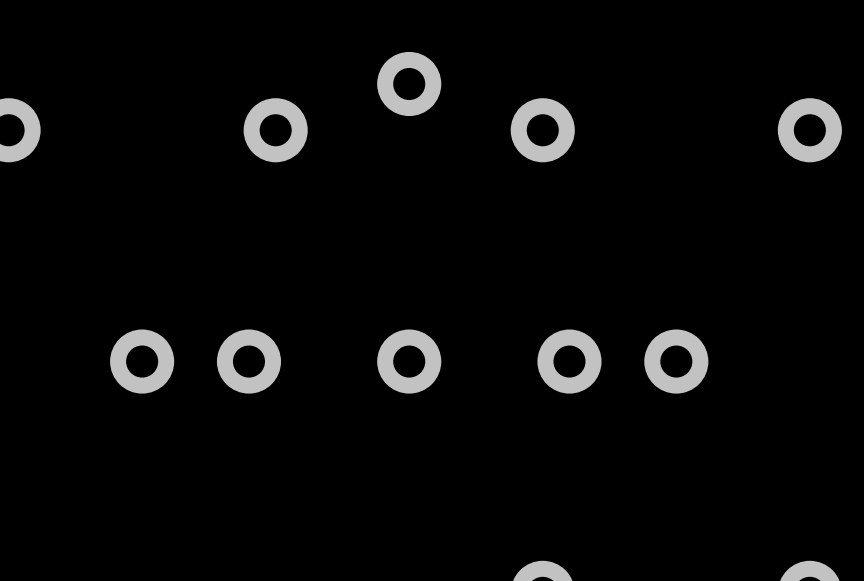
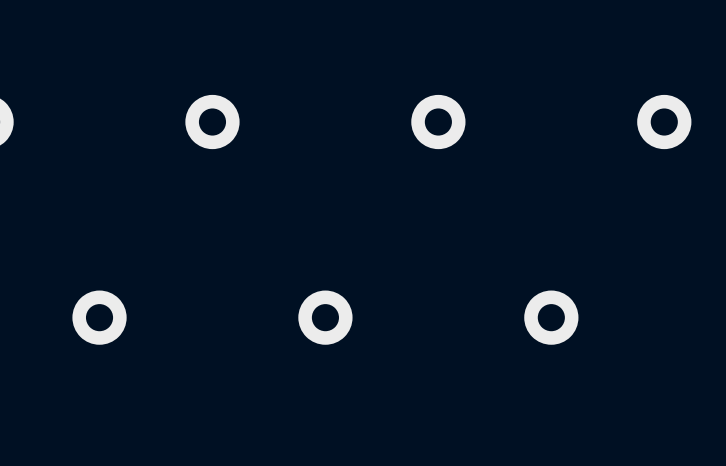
via: (409, 83) -> none
via: (248, 361) -> none
via: (569, 361) -> none

